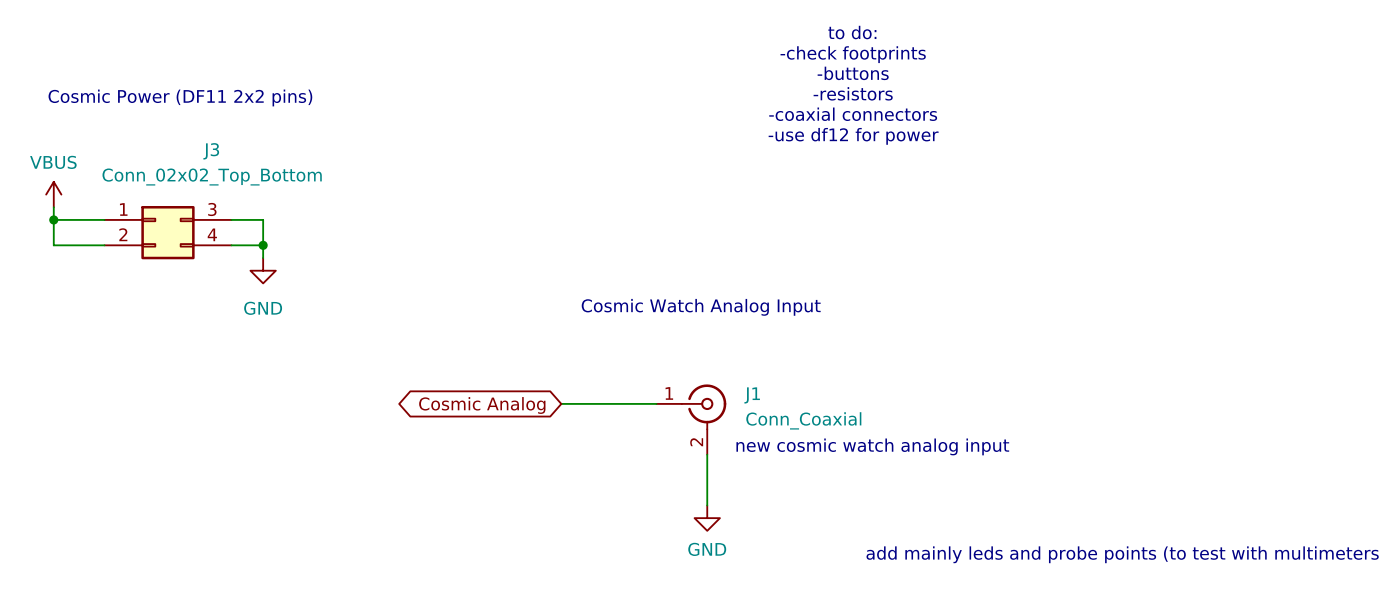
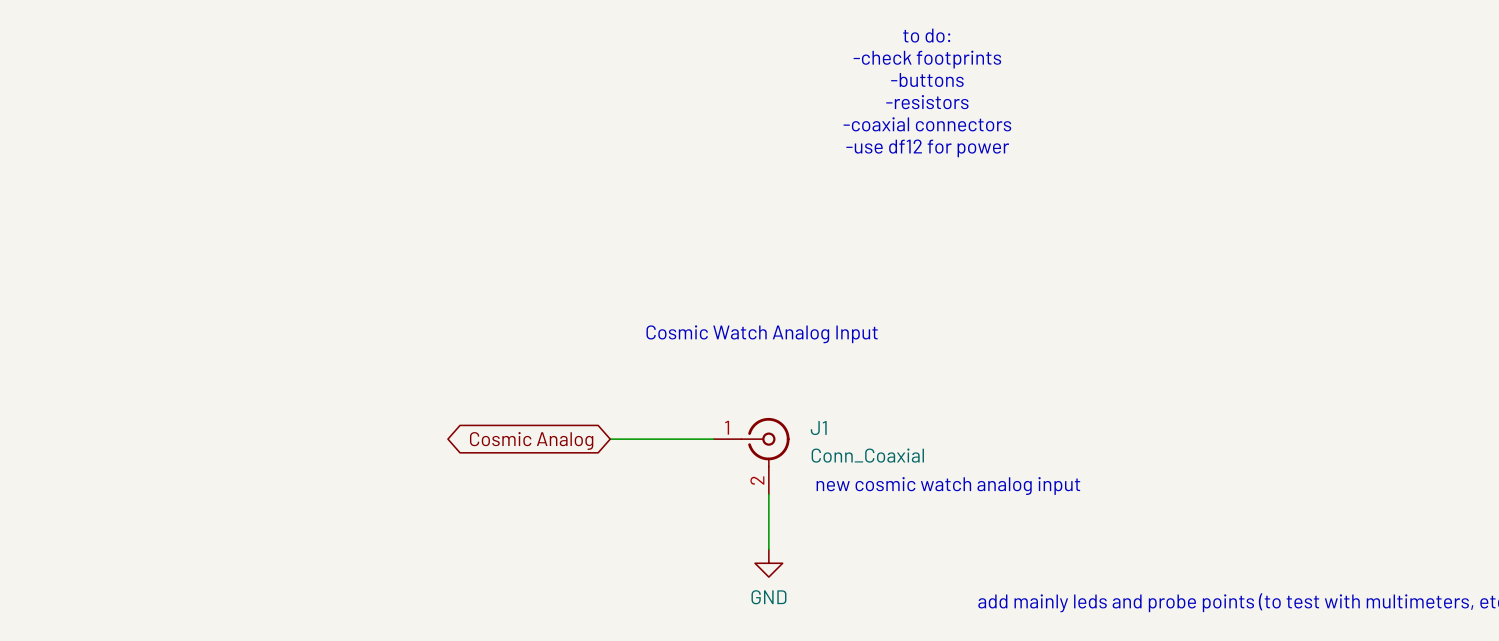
text: Cosmic Power (DF11 2x2 pins) (180, 97) -> none
power symbol: VBUS (53, 194) -> none
wire: (53, 207) (53, 245) (104, 245) -> none
wire: (53, 219) (104, 219) -> none
junction: (53, 219) -> none
wire: (231, 219) (263, 219) (263, 258) -> none
J3: Conn_02x02_Top_Bottom (167, 232) -> none
wire: (231, 245) (263, 245) -> none
junction: (263, 245) -> none
power symbol: GND (263, 270) -> none

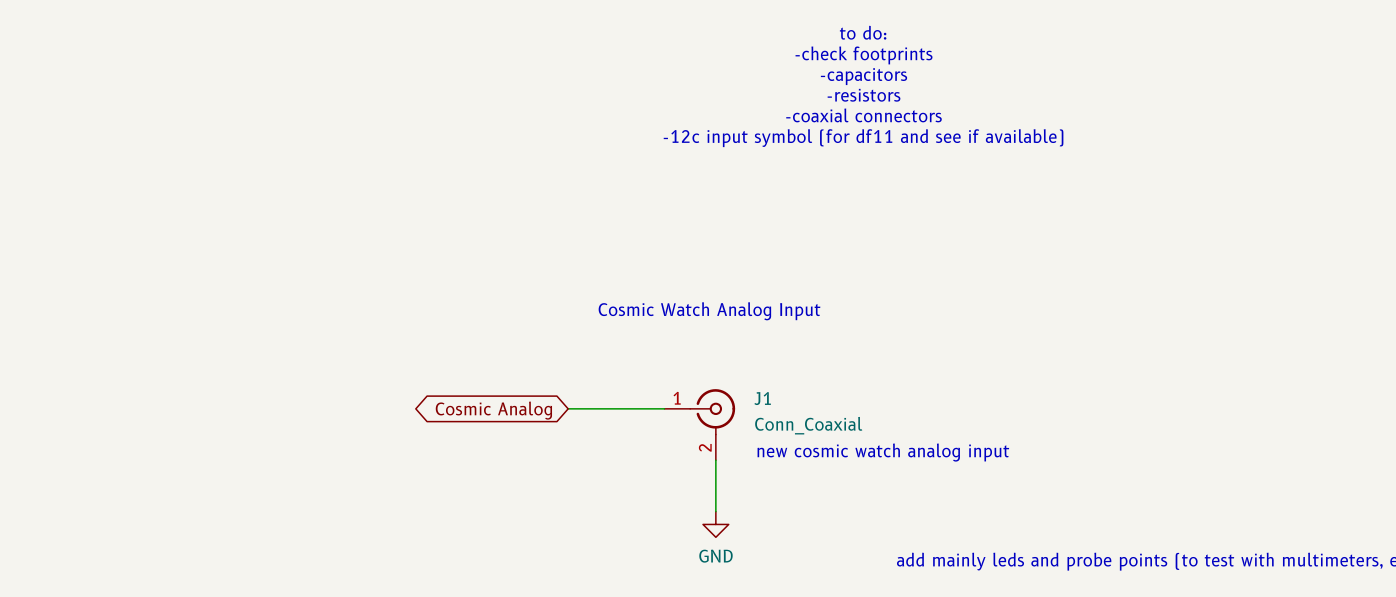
text: -buttons (927, 80) -> -capacitors (864, 76)
text: -use df12 for power (927, 148) -> -12c input symbol (for df11 and see if available) (863, 138)

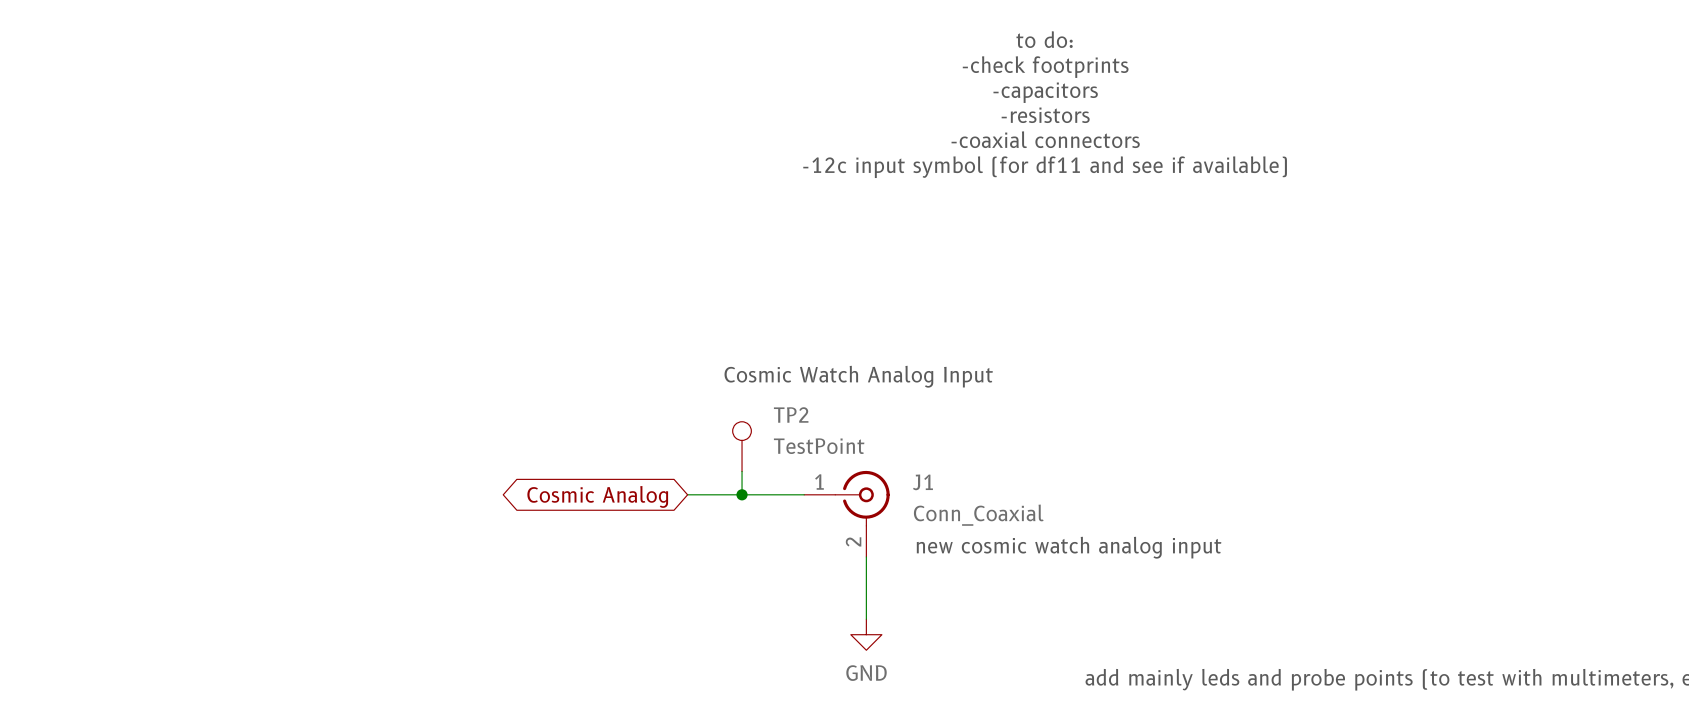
TP2: none -> TestPoint (742, 446)
wire: none -> (742, 471) (742, 494)
junction: none -> (742, 494)

